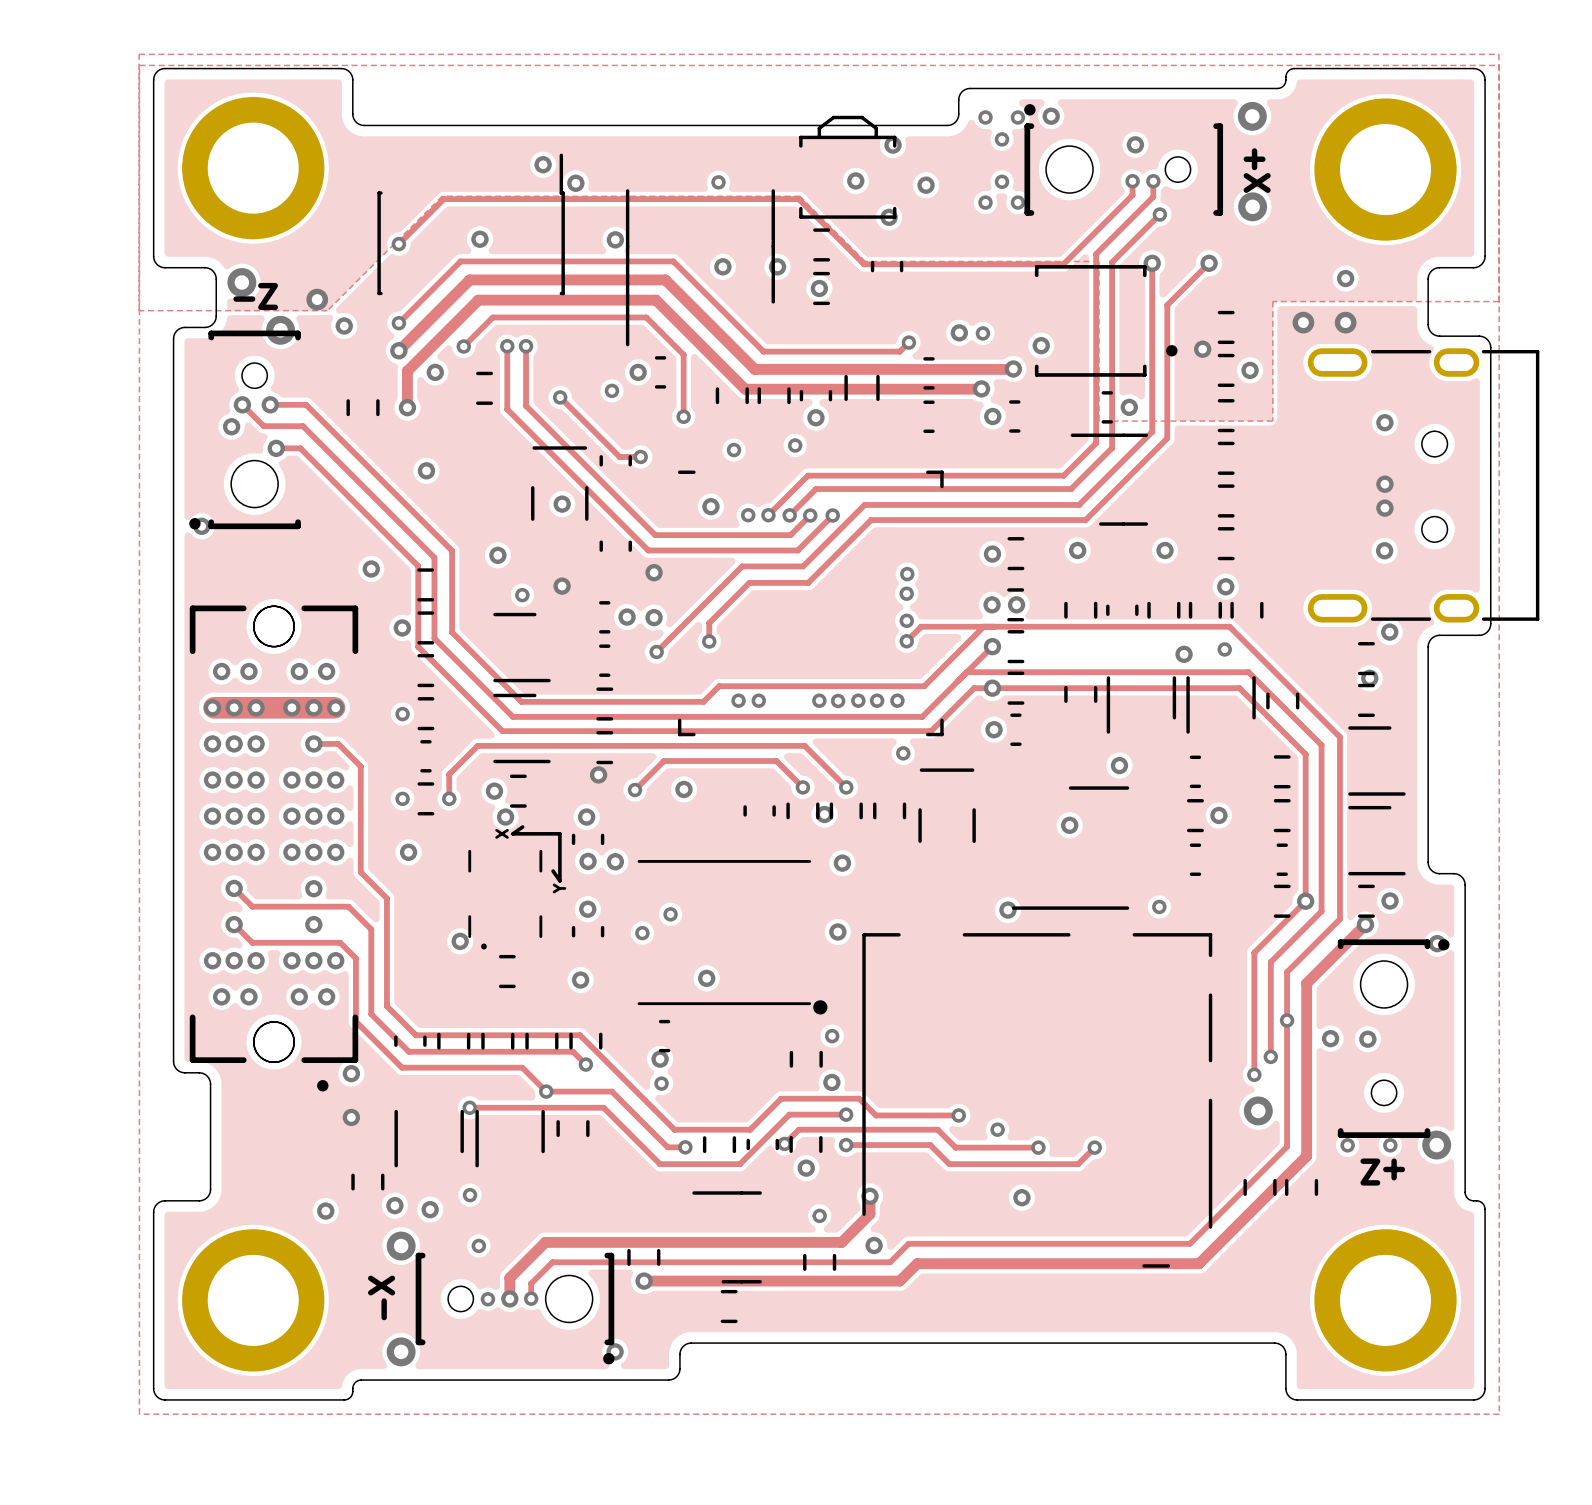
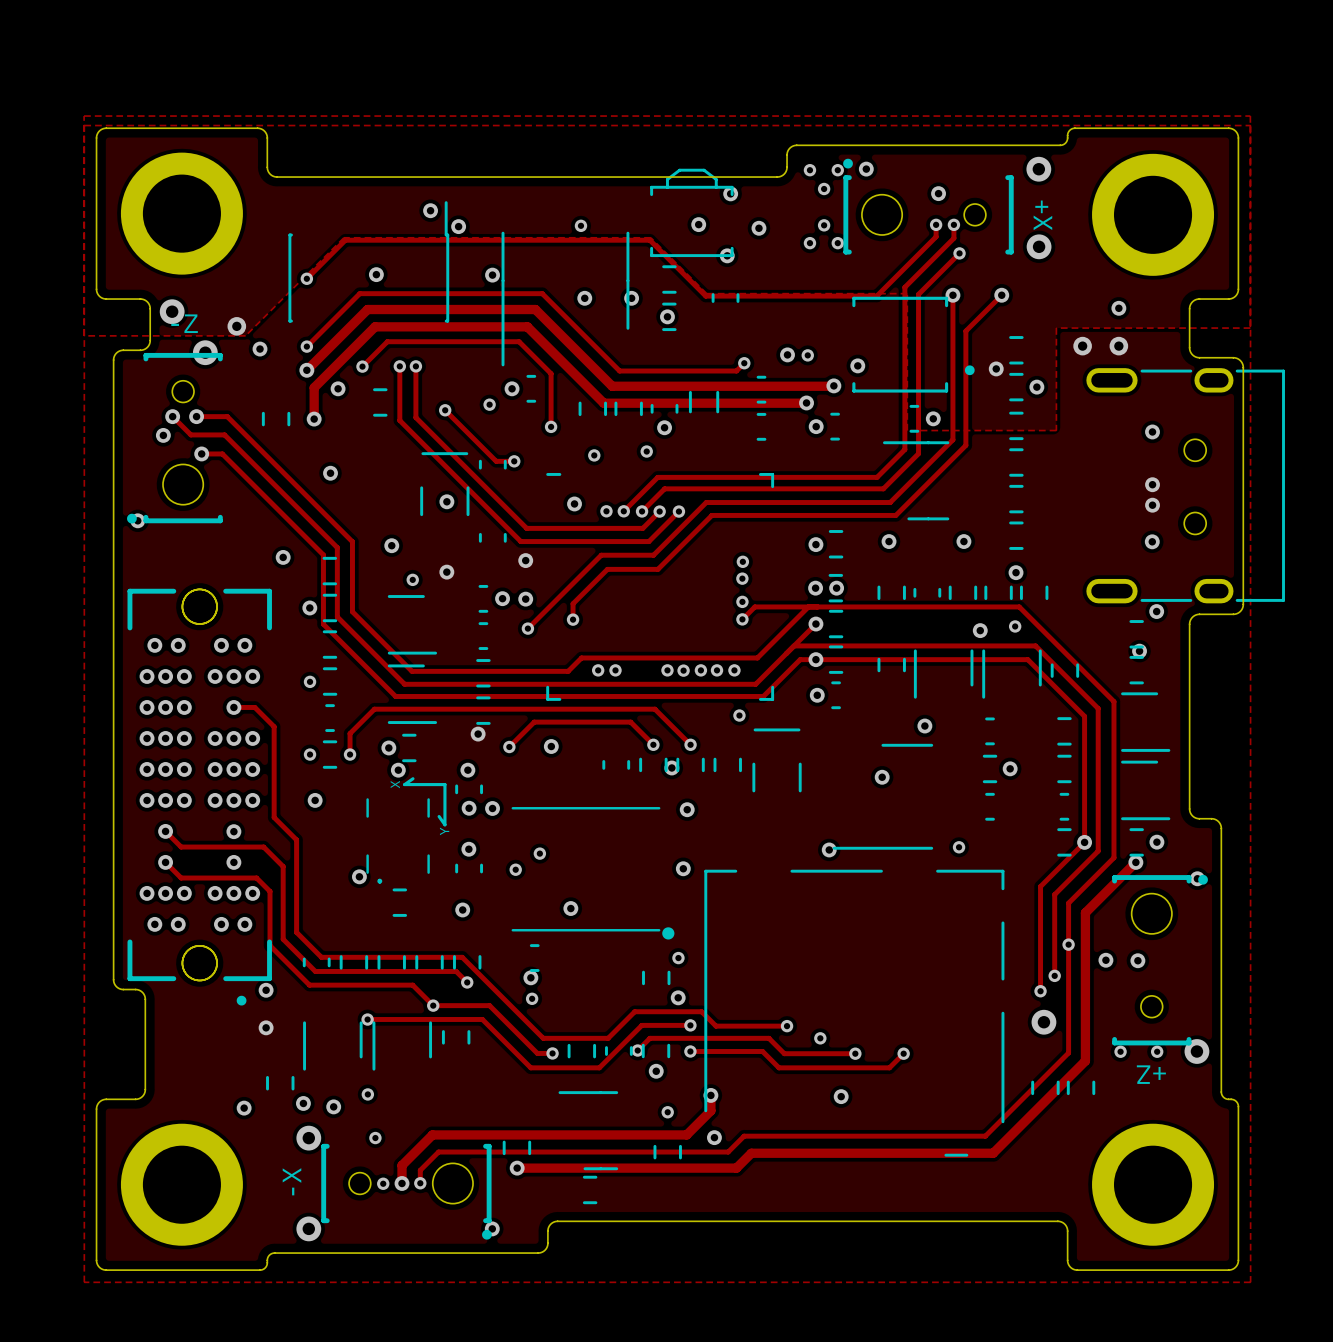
track: (212, 707) (334, 707) -> none

